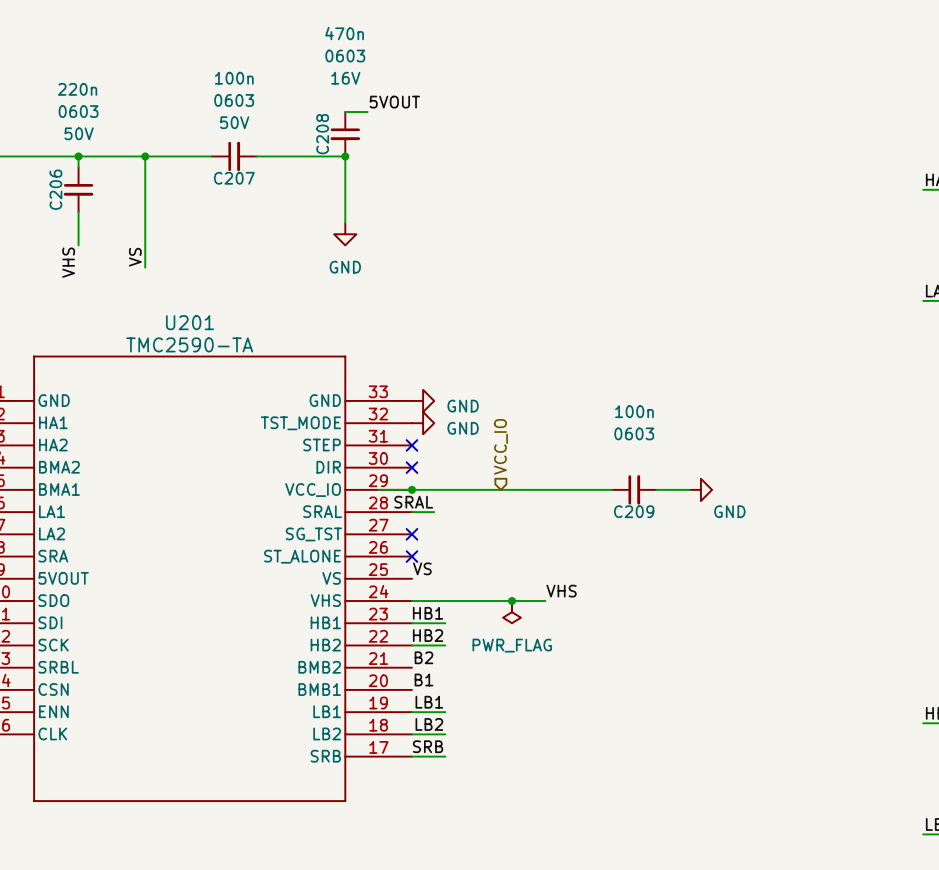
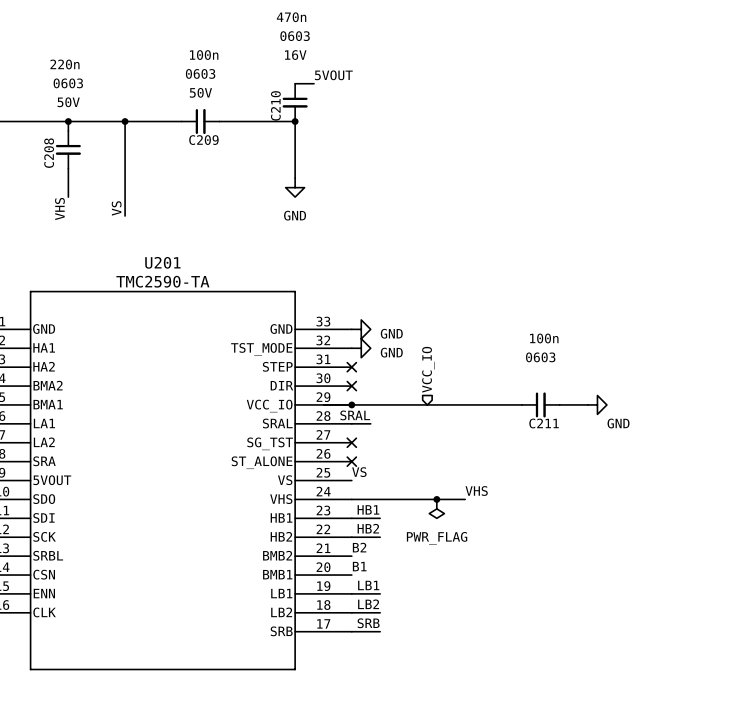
C208 name: C208 (322, 134) -> C210 (275, 105)
C207 name: C207 (234, 178) -> C209 (203, 140)
C206 name: C206 (55, 189) -> C208 (49, 153)
C209 name: C209 (634, 511) -> C211 (544, 423)

